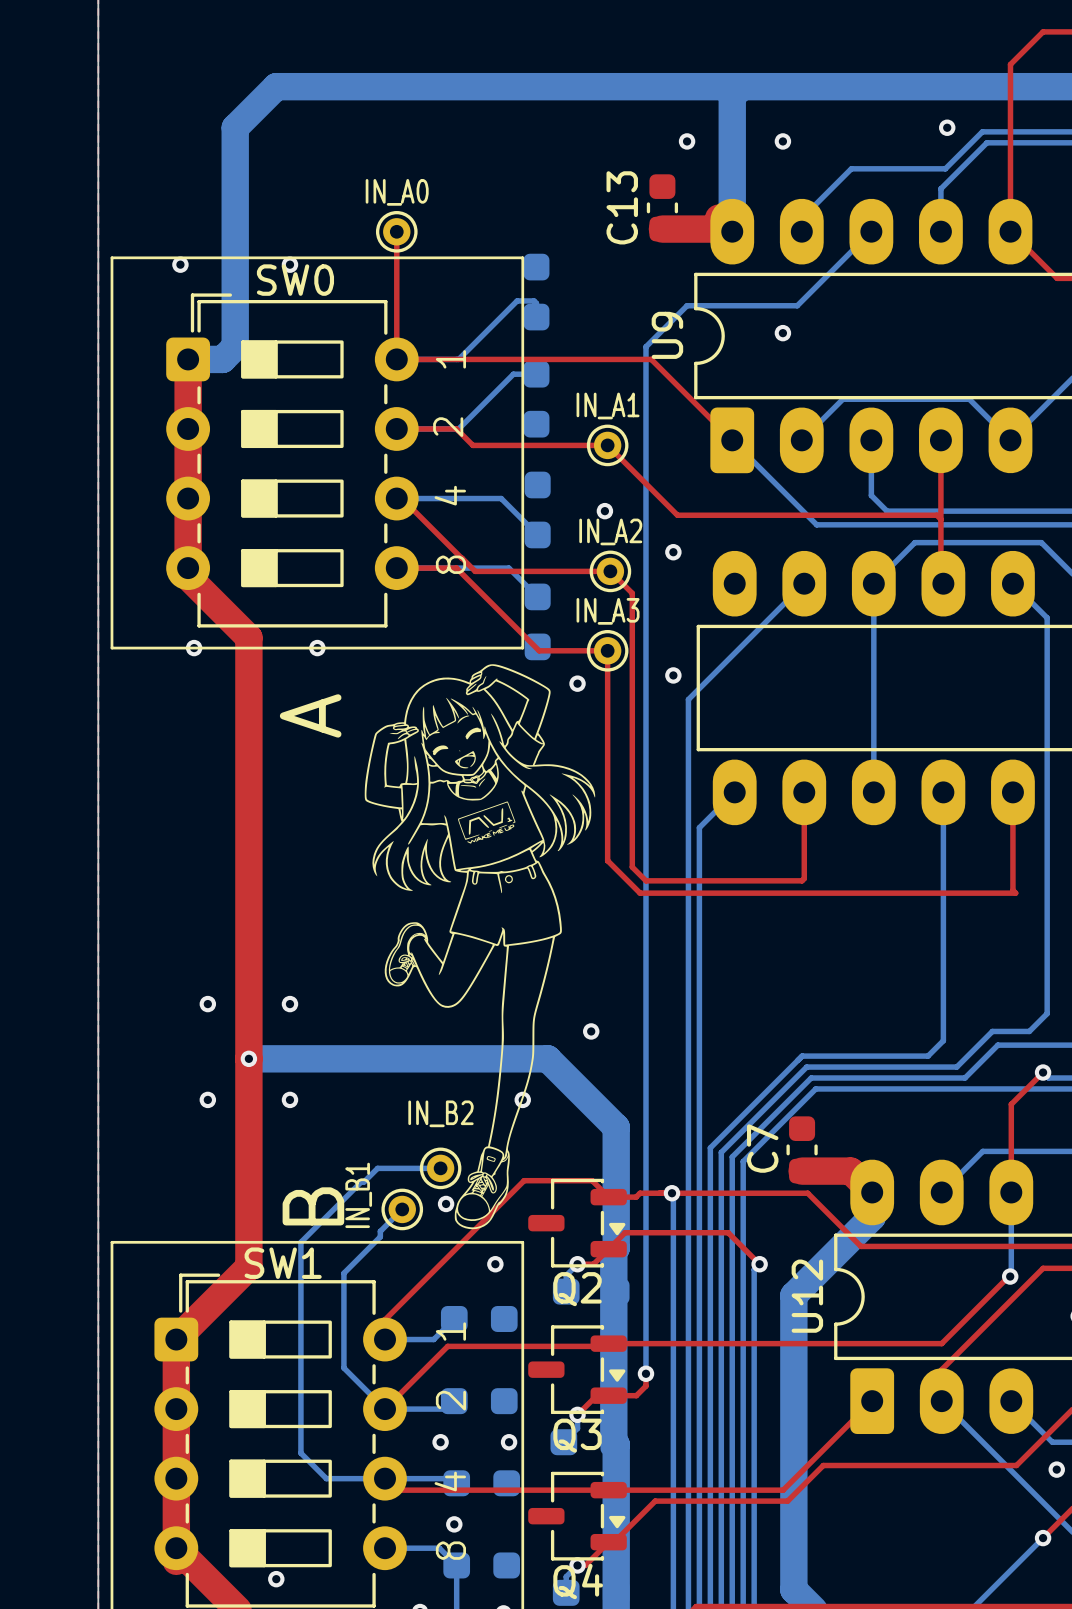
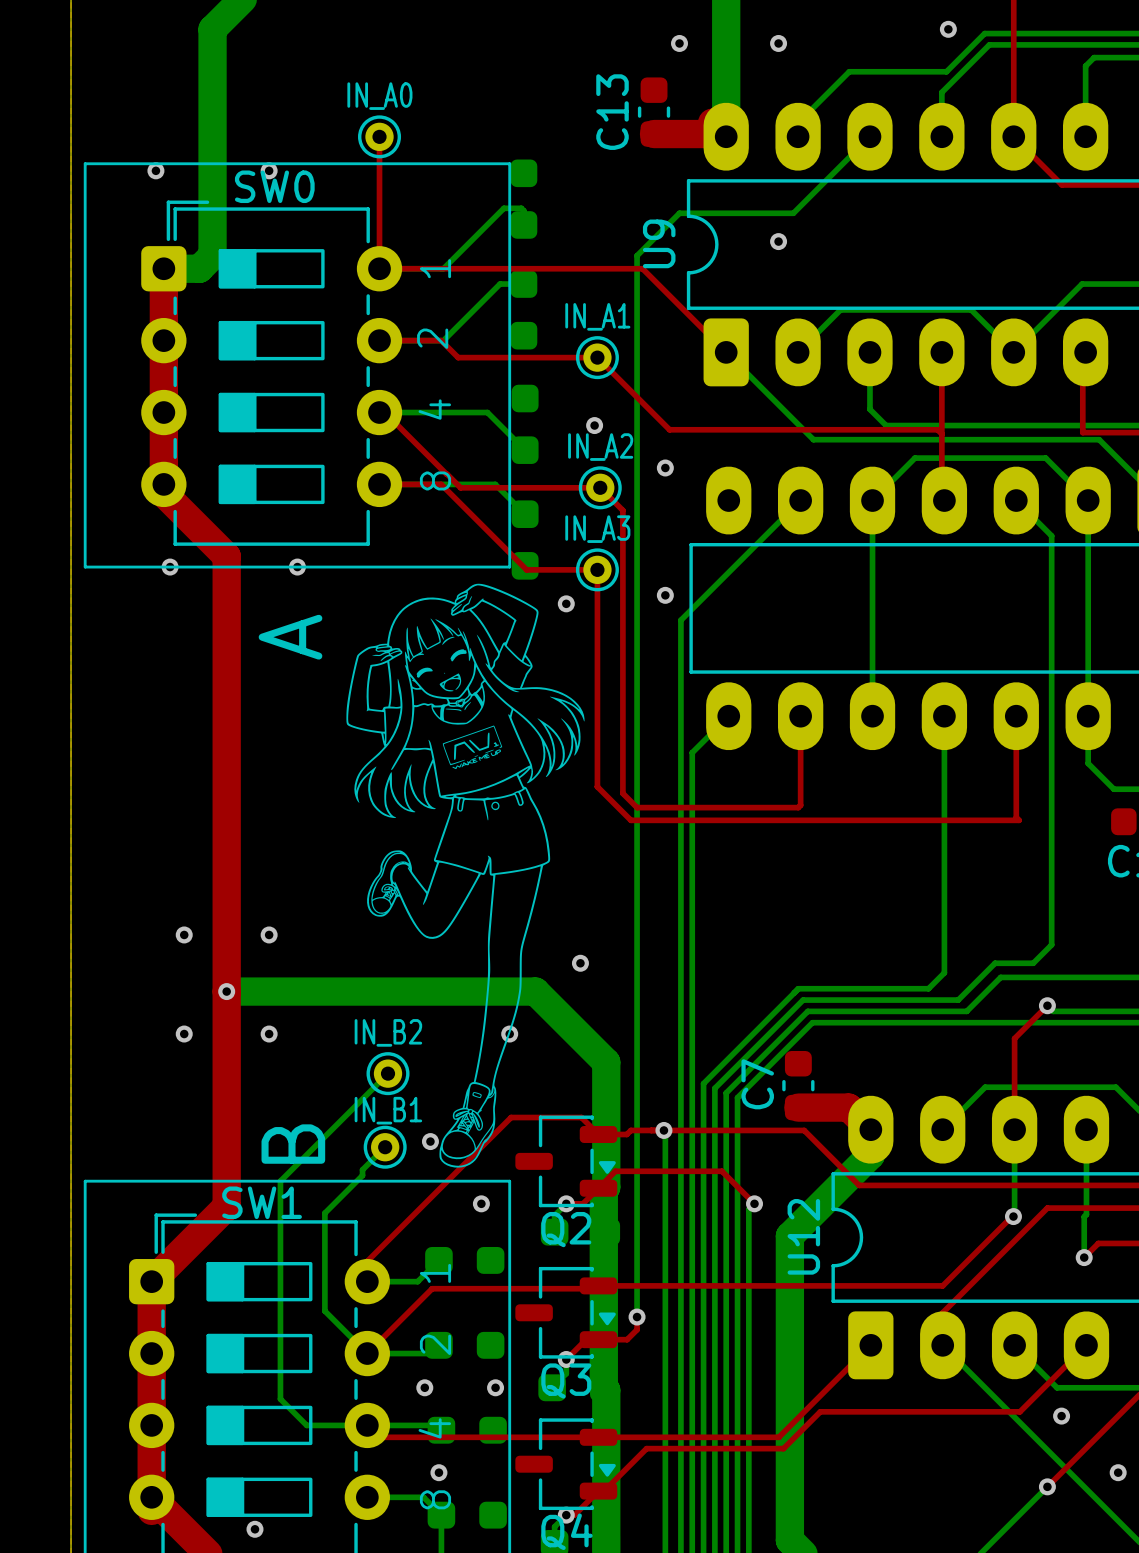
IN_B2 name position: IN_B2 (440, 1113) -> IN_B2 (388, 1032)
bottom track: (440, 1168) (377, 1168) (363, 1182) (361, 1182) -> (388, 1073) (342, 1118)
IN_B2 position: (440, 1168) -> (388, 1073)
IN_B1 name rotation: 0° (358, 1195) -> 90° clockwise (388, 1110)

